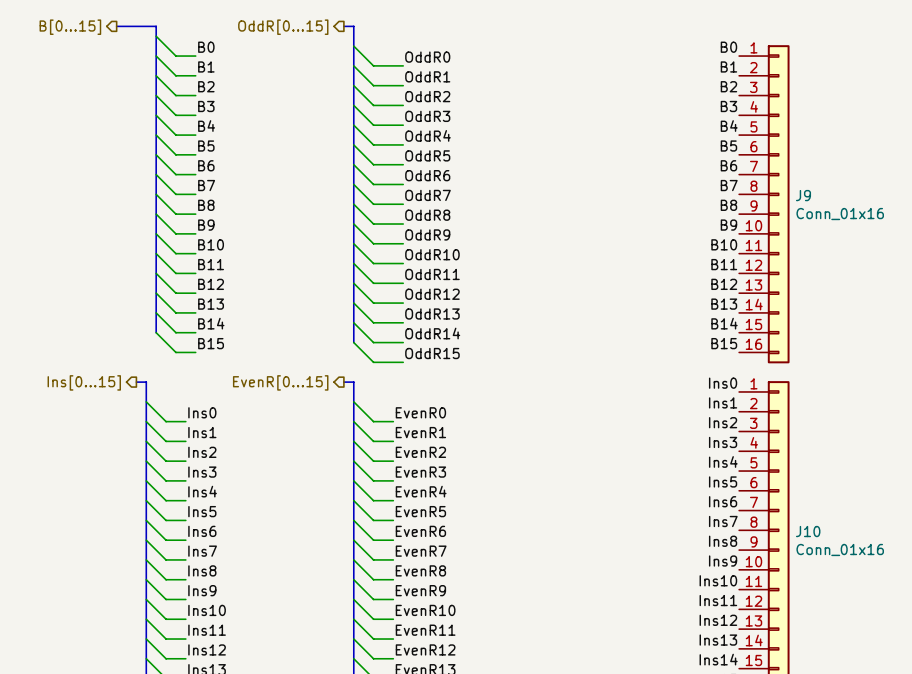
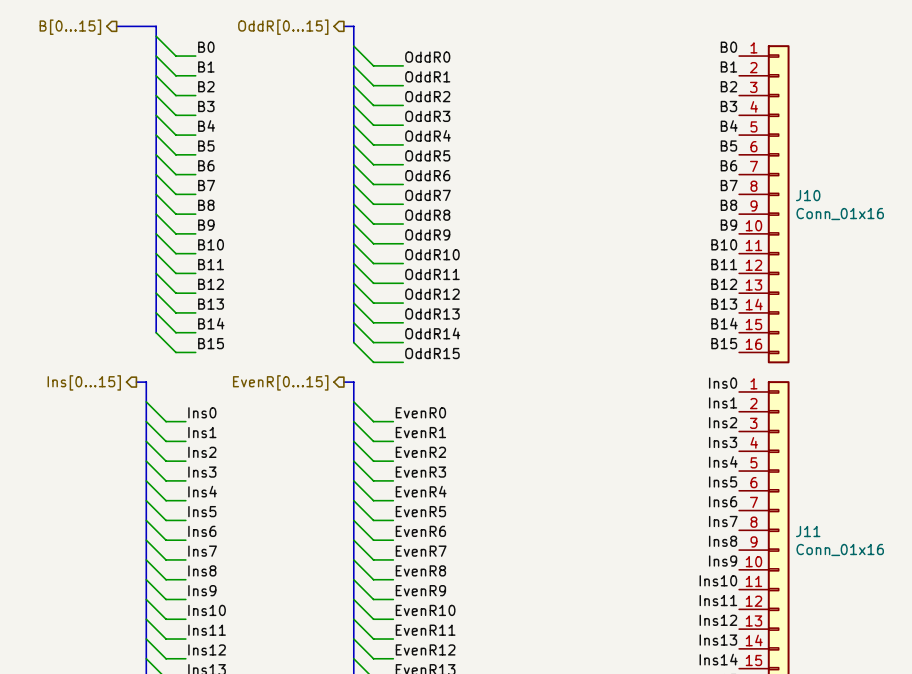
J9 name: J9 (803, 195) -> J10 (808, 195)
J10 name: J10 (808, 531) -> J11 (808, 531)

